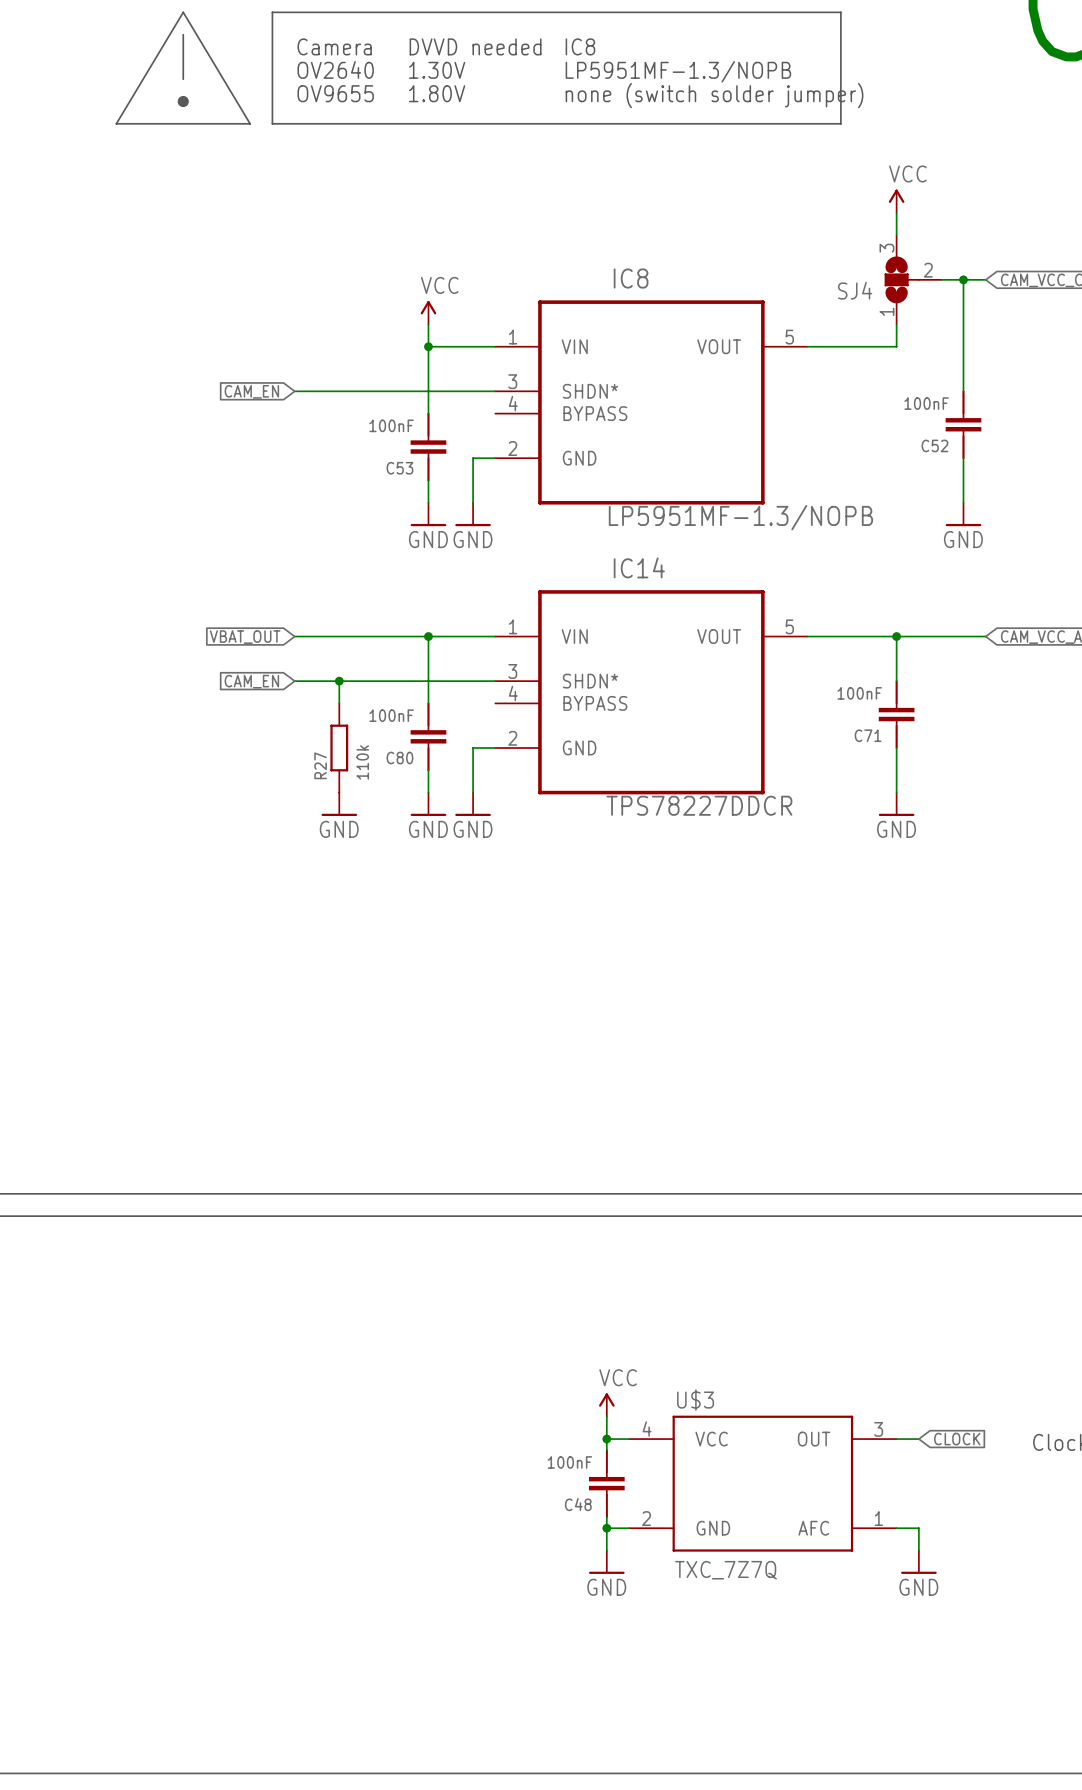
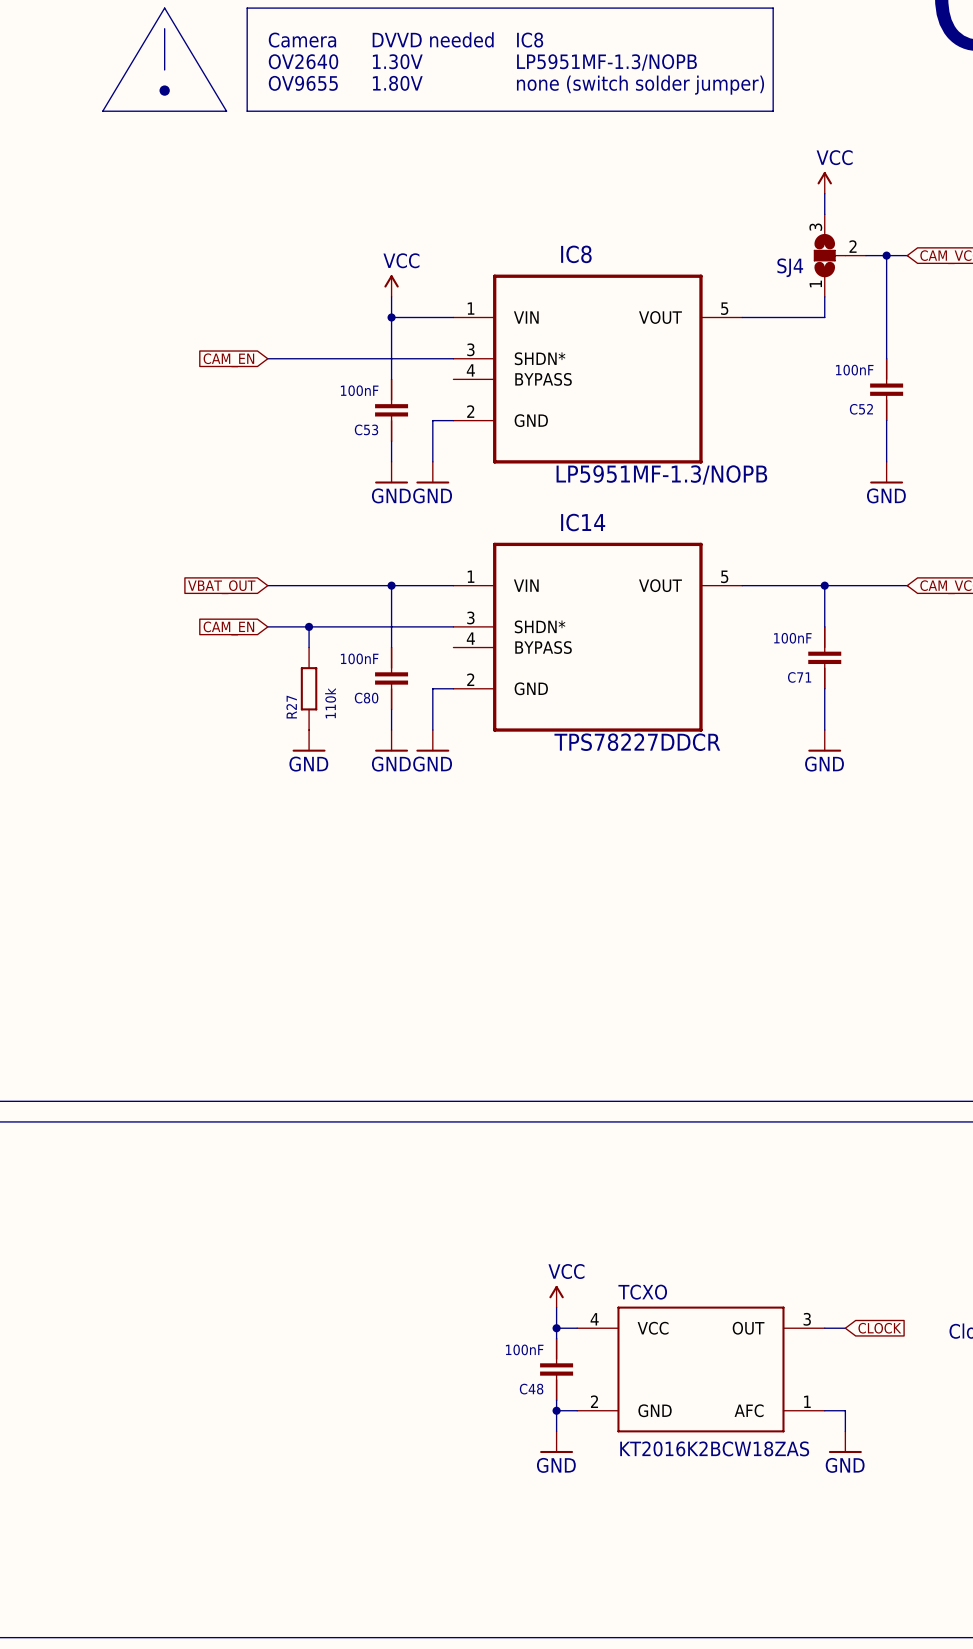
U$3 name: U$3 (695, 1400) -> TCXO (642, 1292)
U$3 value: TXC_7Z7Q (726, 1570) -> KT2016K2BCW18ZAS (714, 1448)

